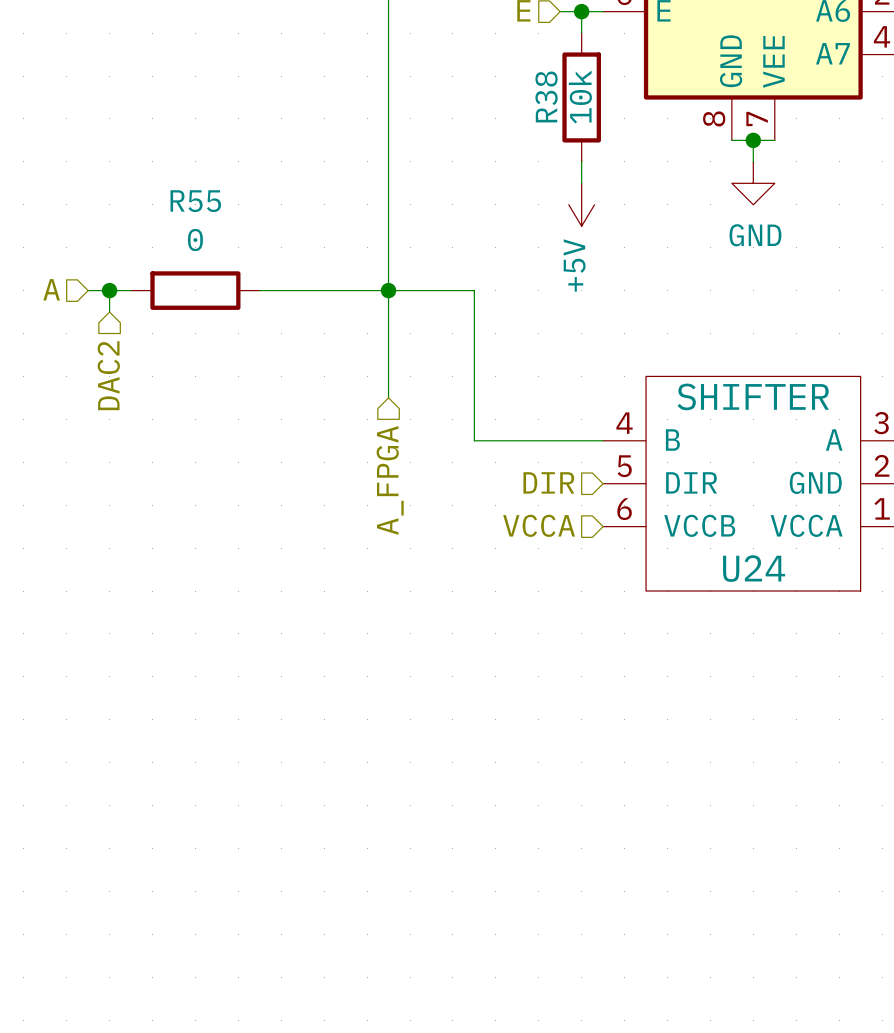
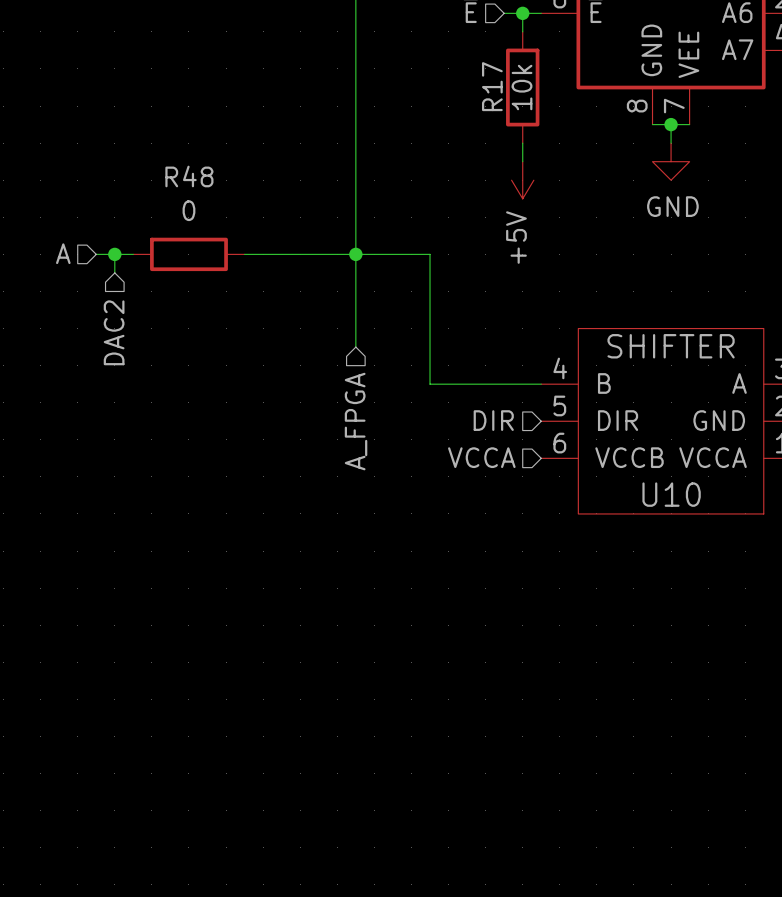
R38 name: R38 (546, 96) -> R17 (492, 86)
R55 name: R55 (195, 201) -> R48 (189, 176)
U24 name: U24 (754, 568) -> U10 (671, 494)

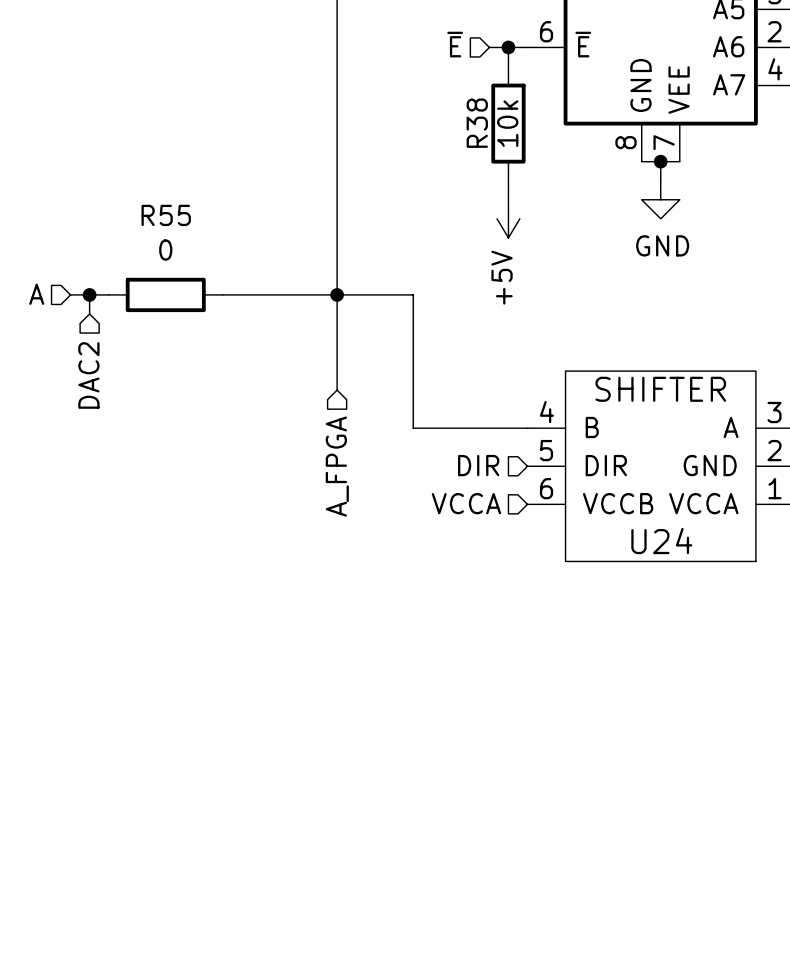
R17 name: R17 (492, 86) -> R38 (477, 123)
R48 name: R48 (189, 176) -> R55 (166, 215)
U10 name: U10 (671, 494) -> U24 (661, 541)

